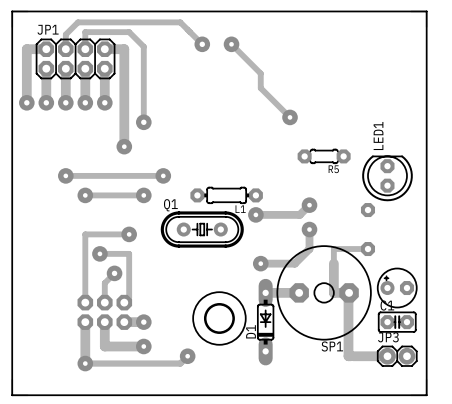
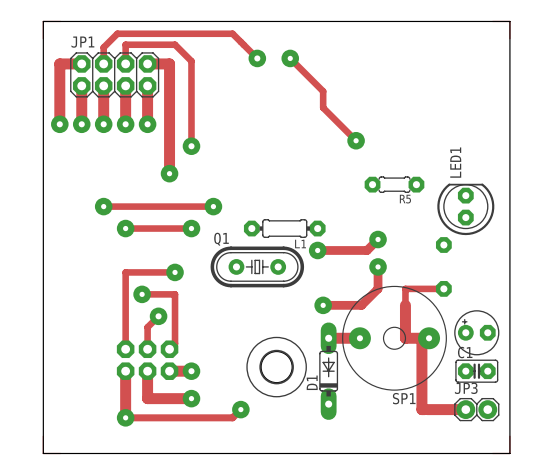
SP1 footprint: [276, 245, 372, 341] -> [342, 285, 447, 391]

